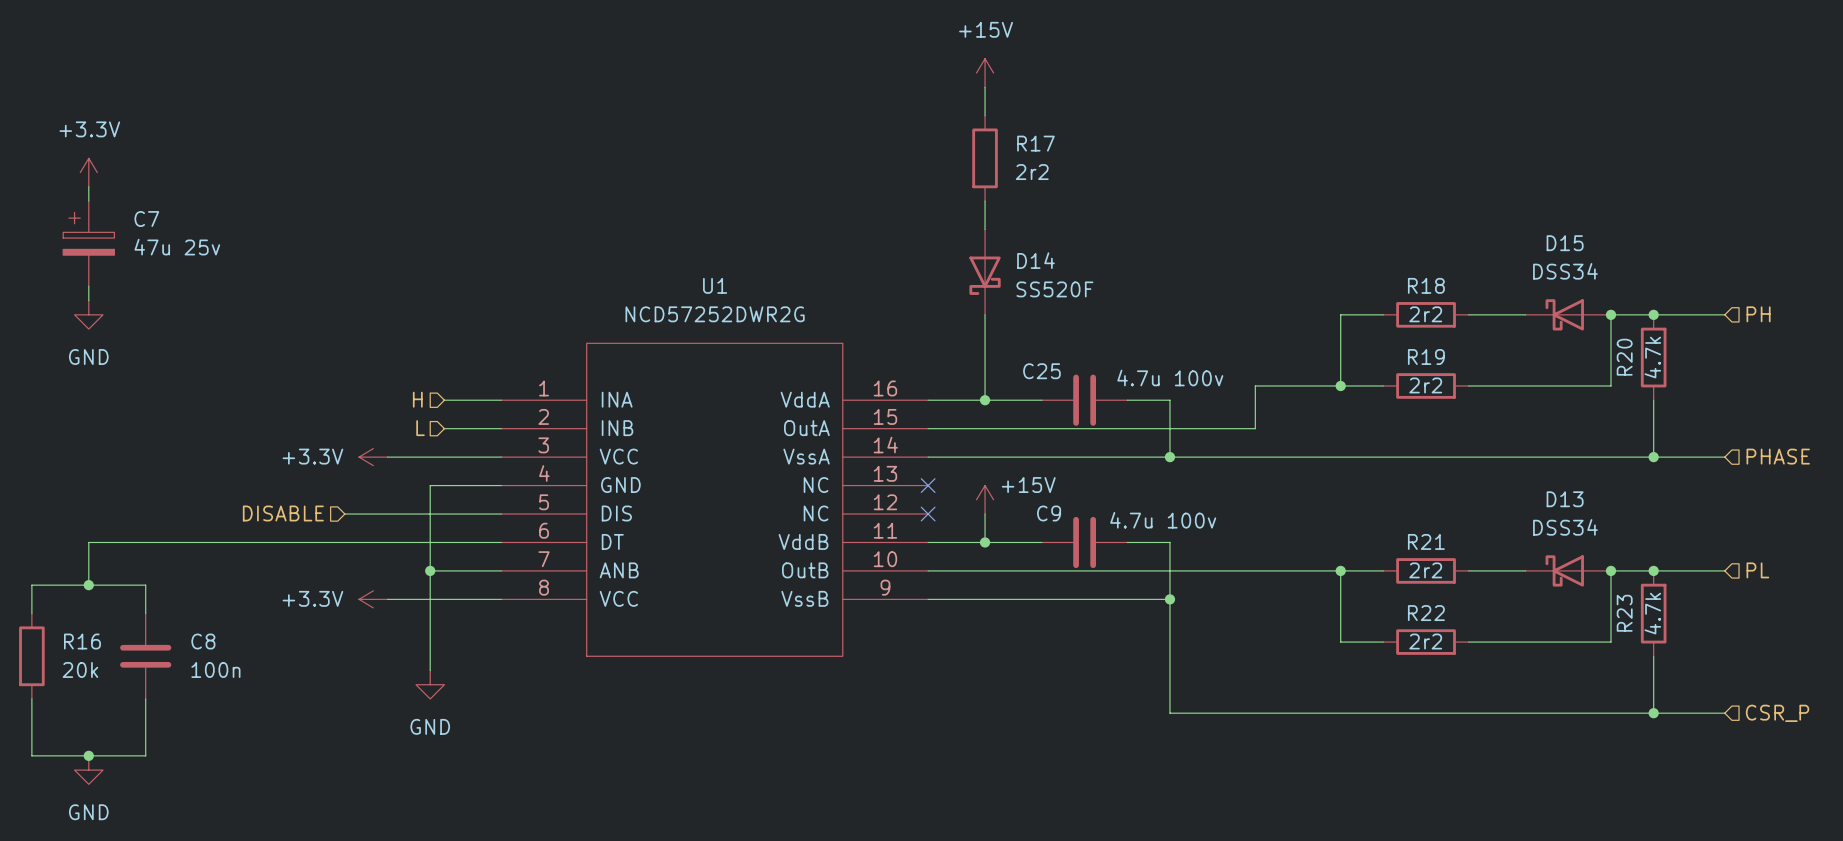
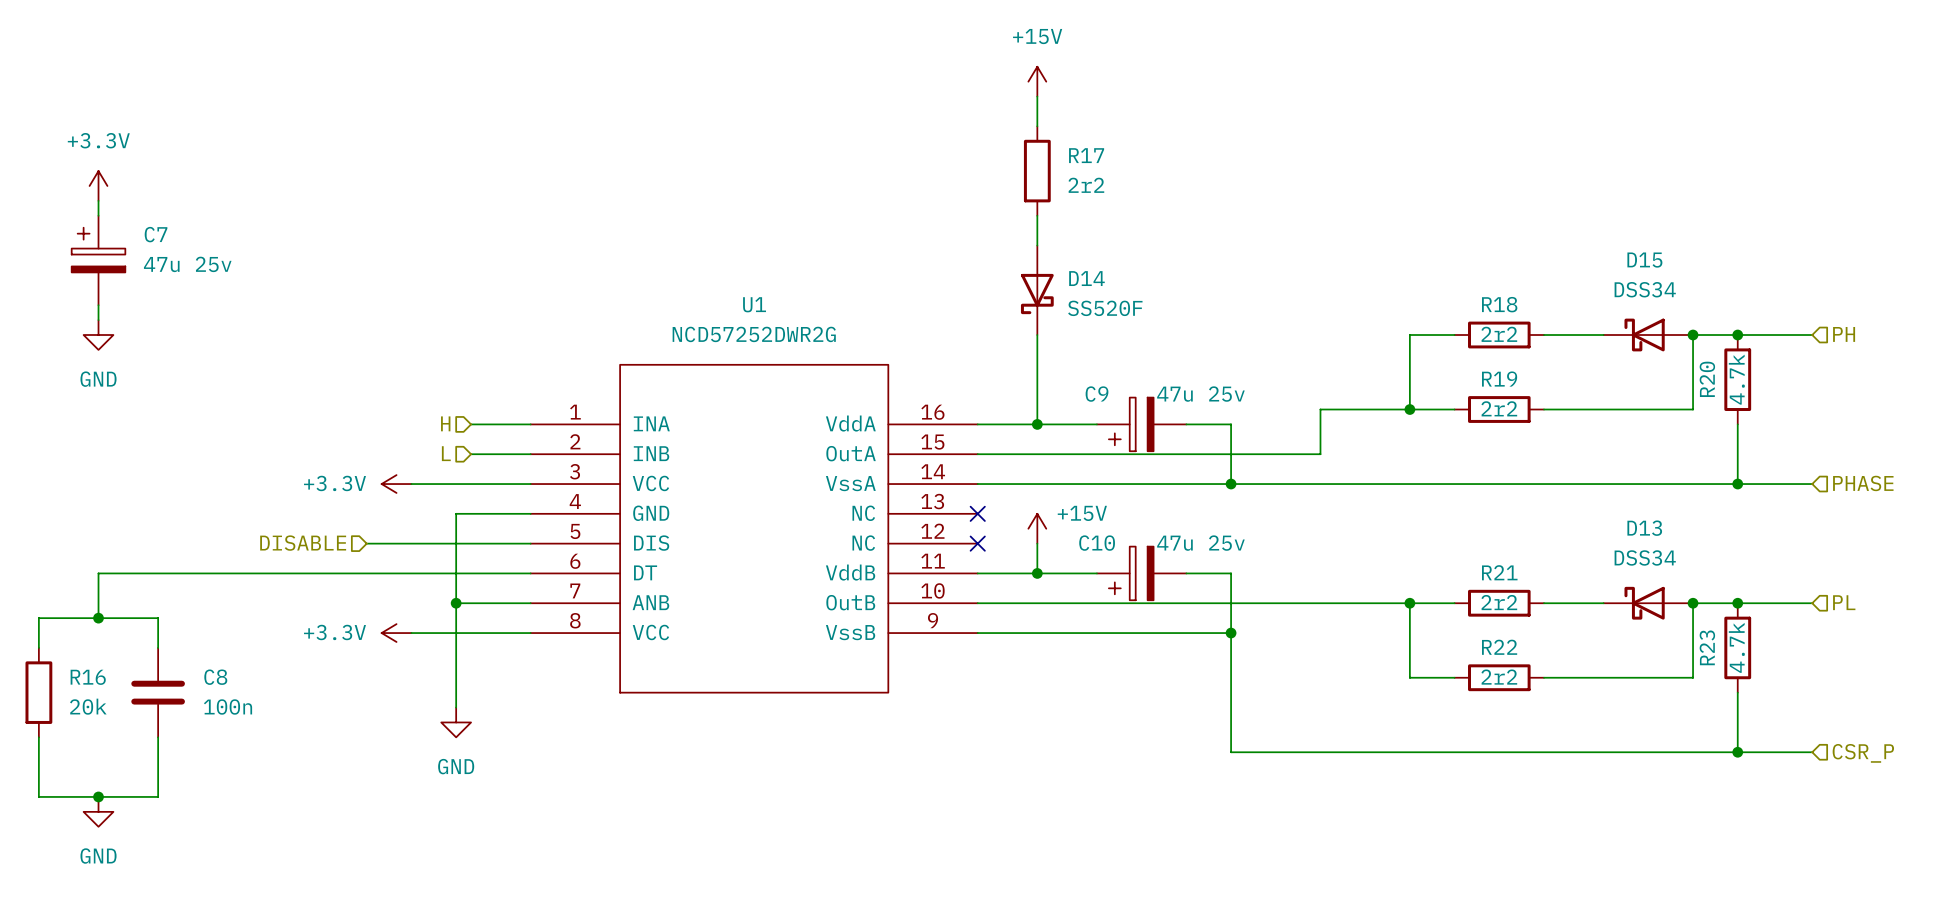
C25: 4.7u 100v (1084, 400) -> none
C9 symbol: [1041, 516, 1128, 569] -> [1096, 397, 1187, 452]
C9 value: 4.7u 100v (1163, 520) -> 47u 25v (1200, 394)
C10: none -> 47u 25v (1141, 573)

